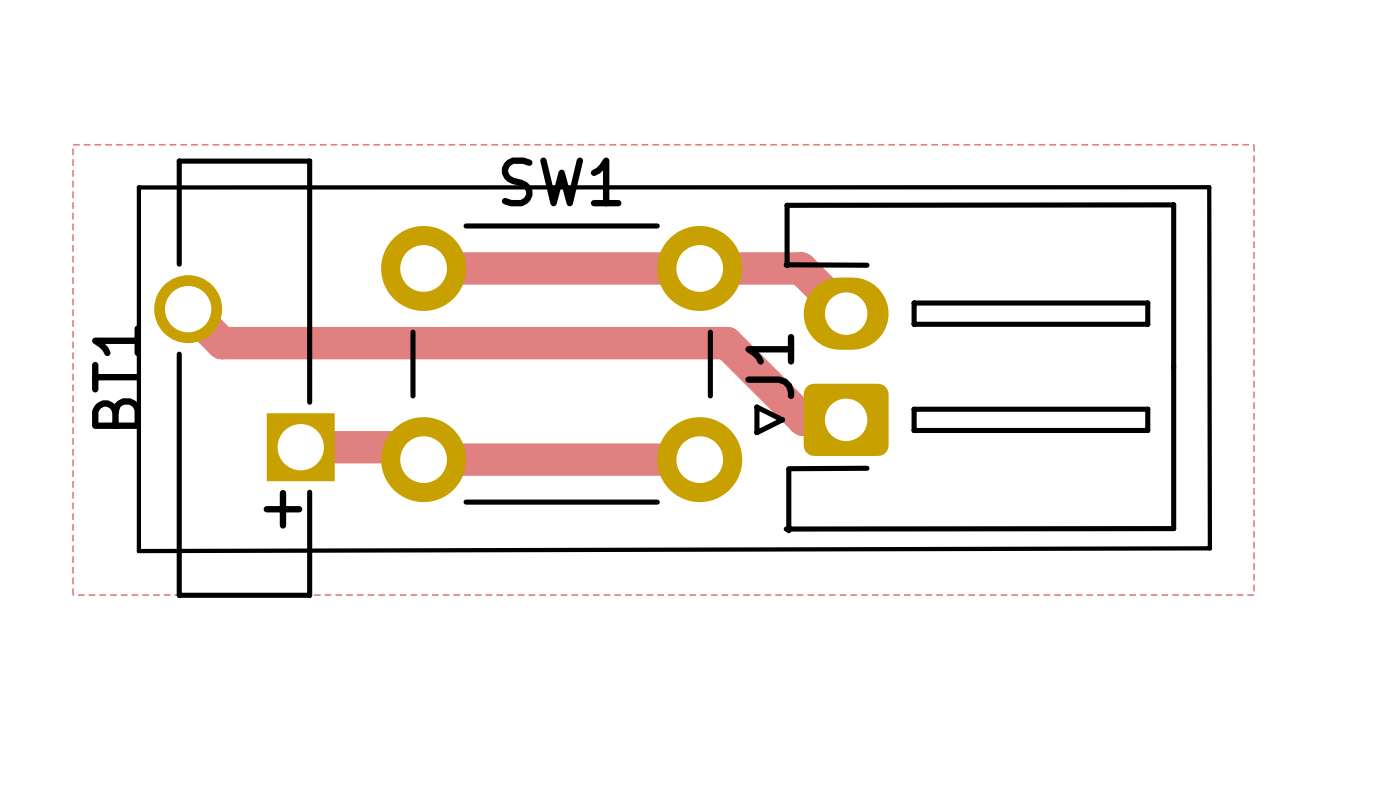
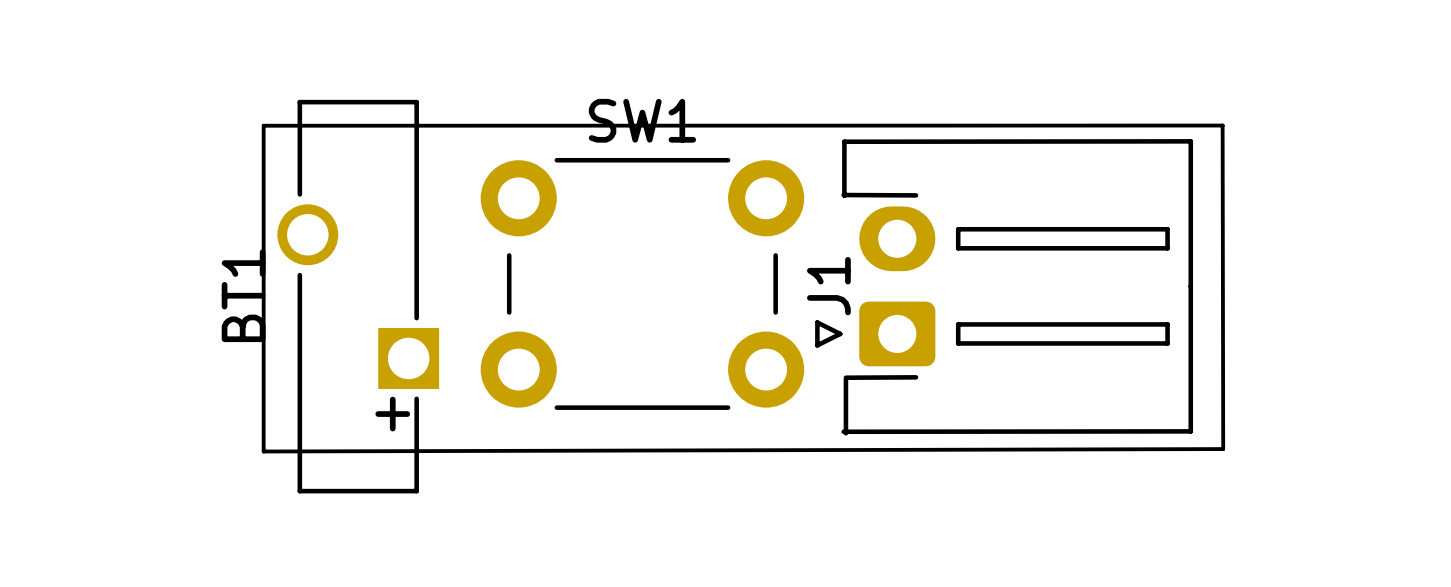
zone outline: (73, 144) (73, 595) (1254, 595) (1254, 144) (73, 144) -> none
track: (423, 268) (800, 268) (846, 313) -> none
track: (188, 309) (222, 343) (726, 343) (803, 419) (846, 419) -> none
track: (300, 447) (411, 447) (423, 459) (699, 459) -> none

